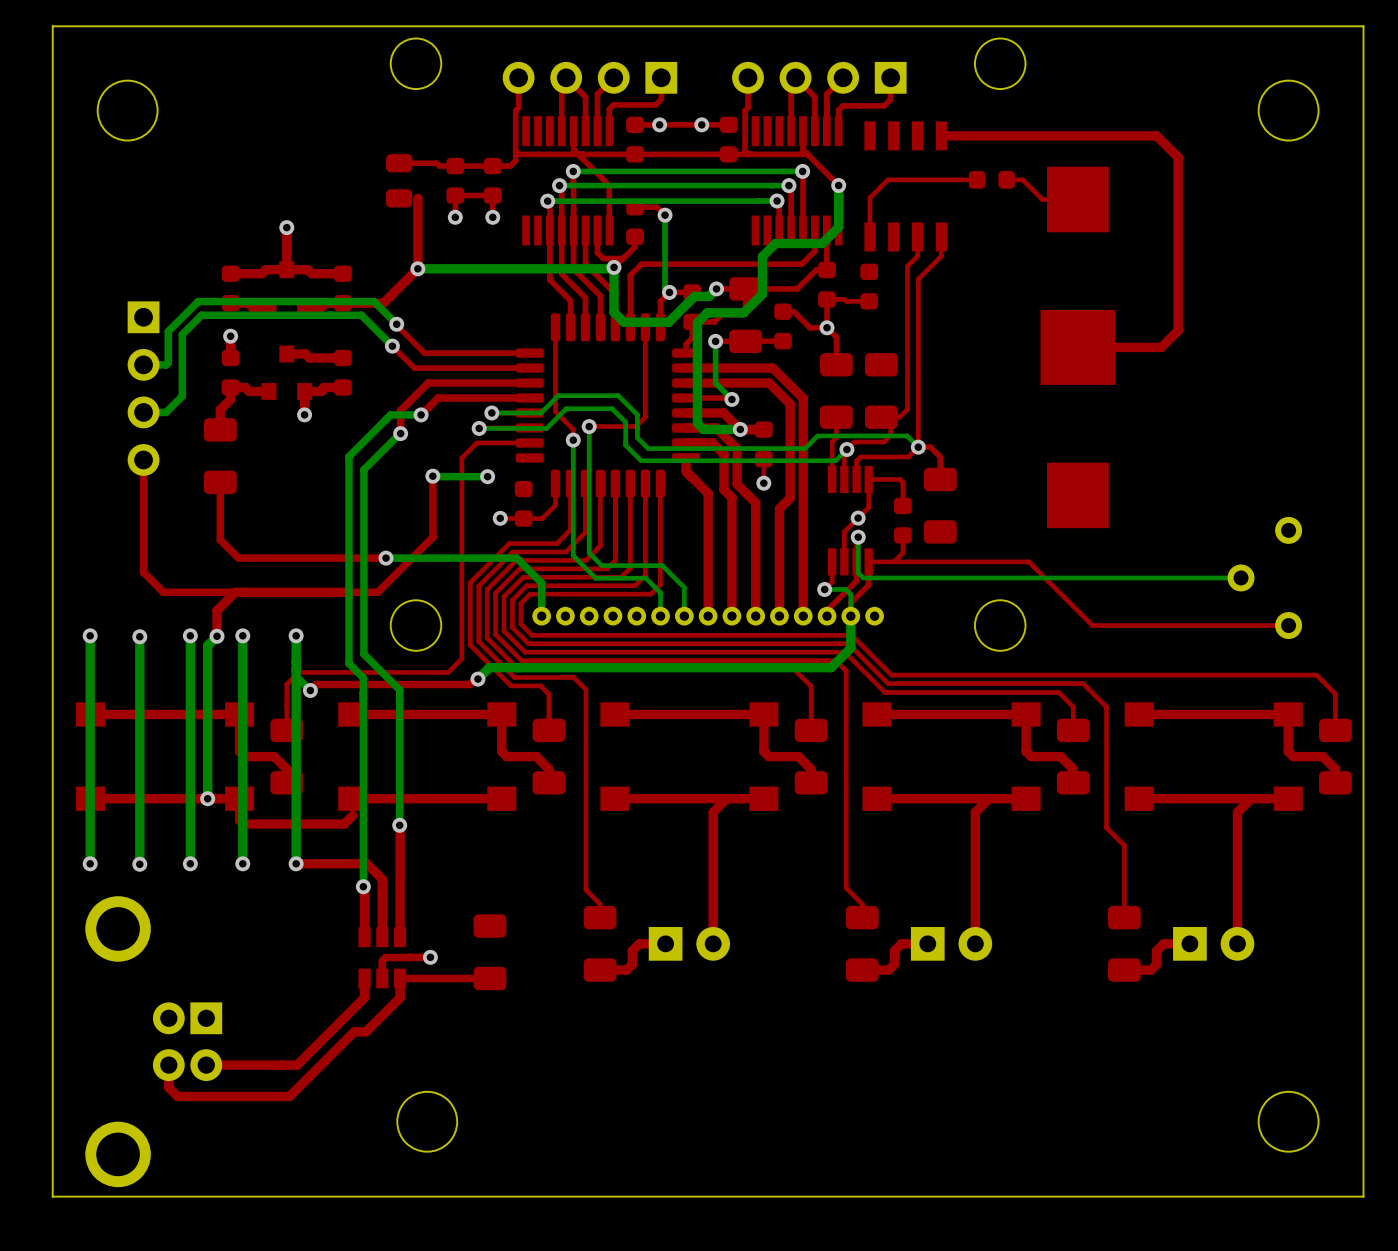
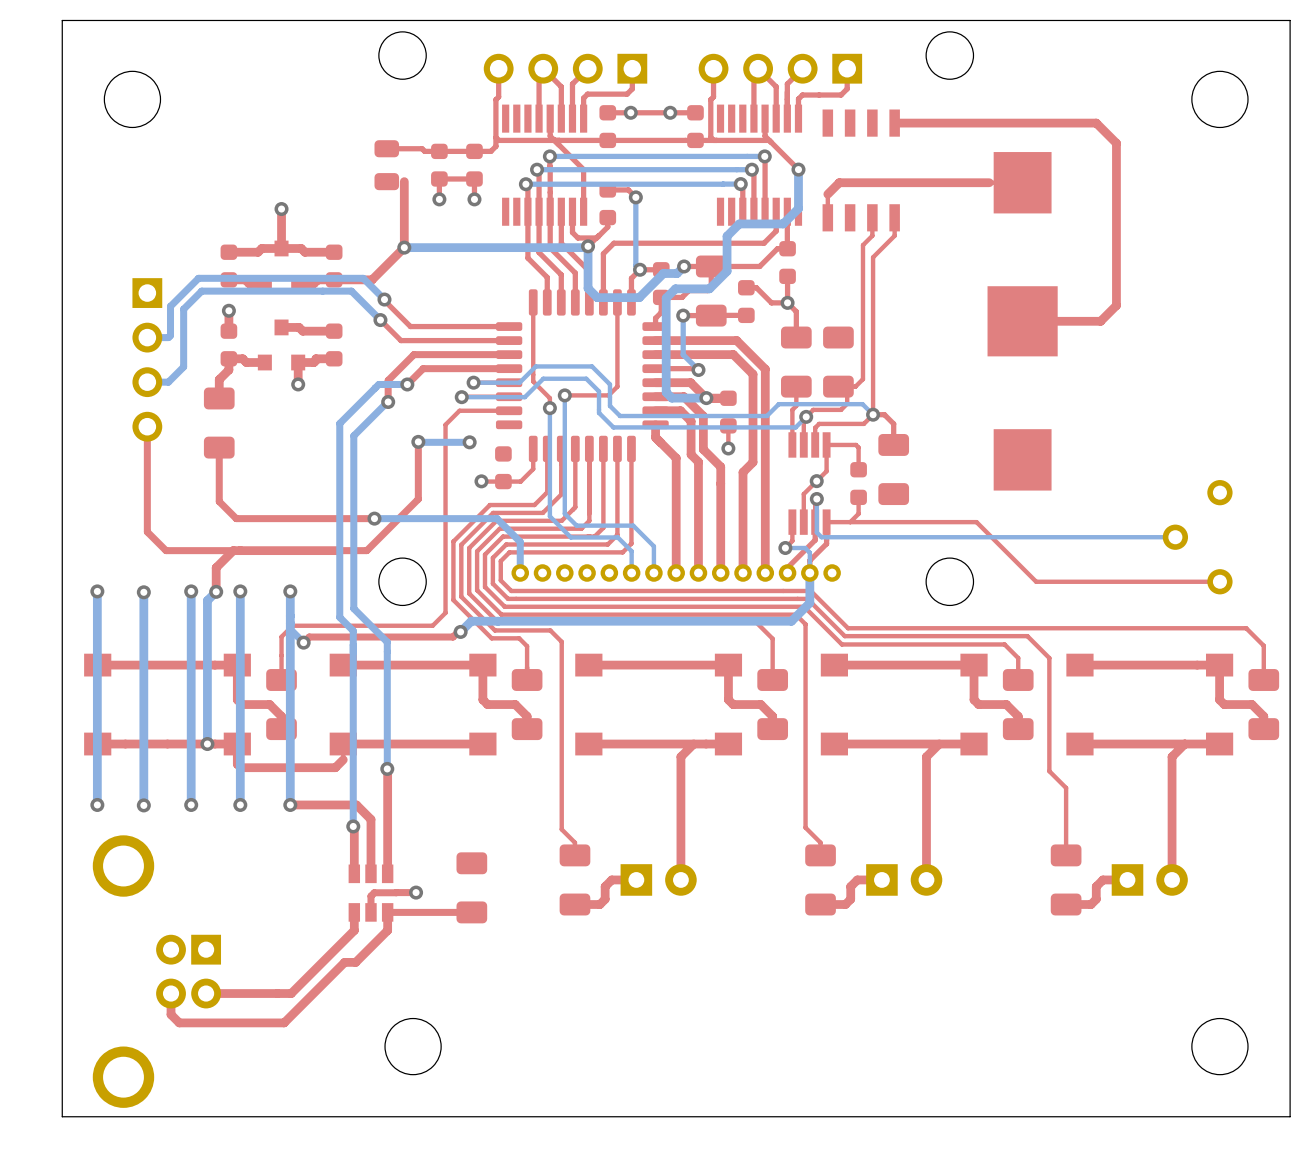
top track: (977, 179) (887, 179) (869, 197) (869, 211) -> (989, 182) (839, 182) (827, 194)
part: (991, 179) -> none
top track: (1006, 179) (1022, 179) (1042, 199) -> none
part: (869, 286) -> none
top track: (827, 299) (869, 301) -> none

